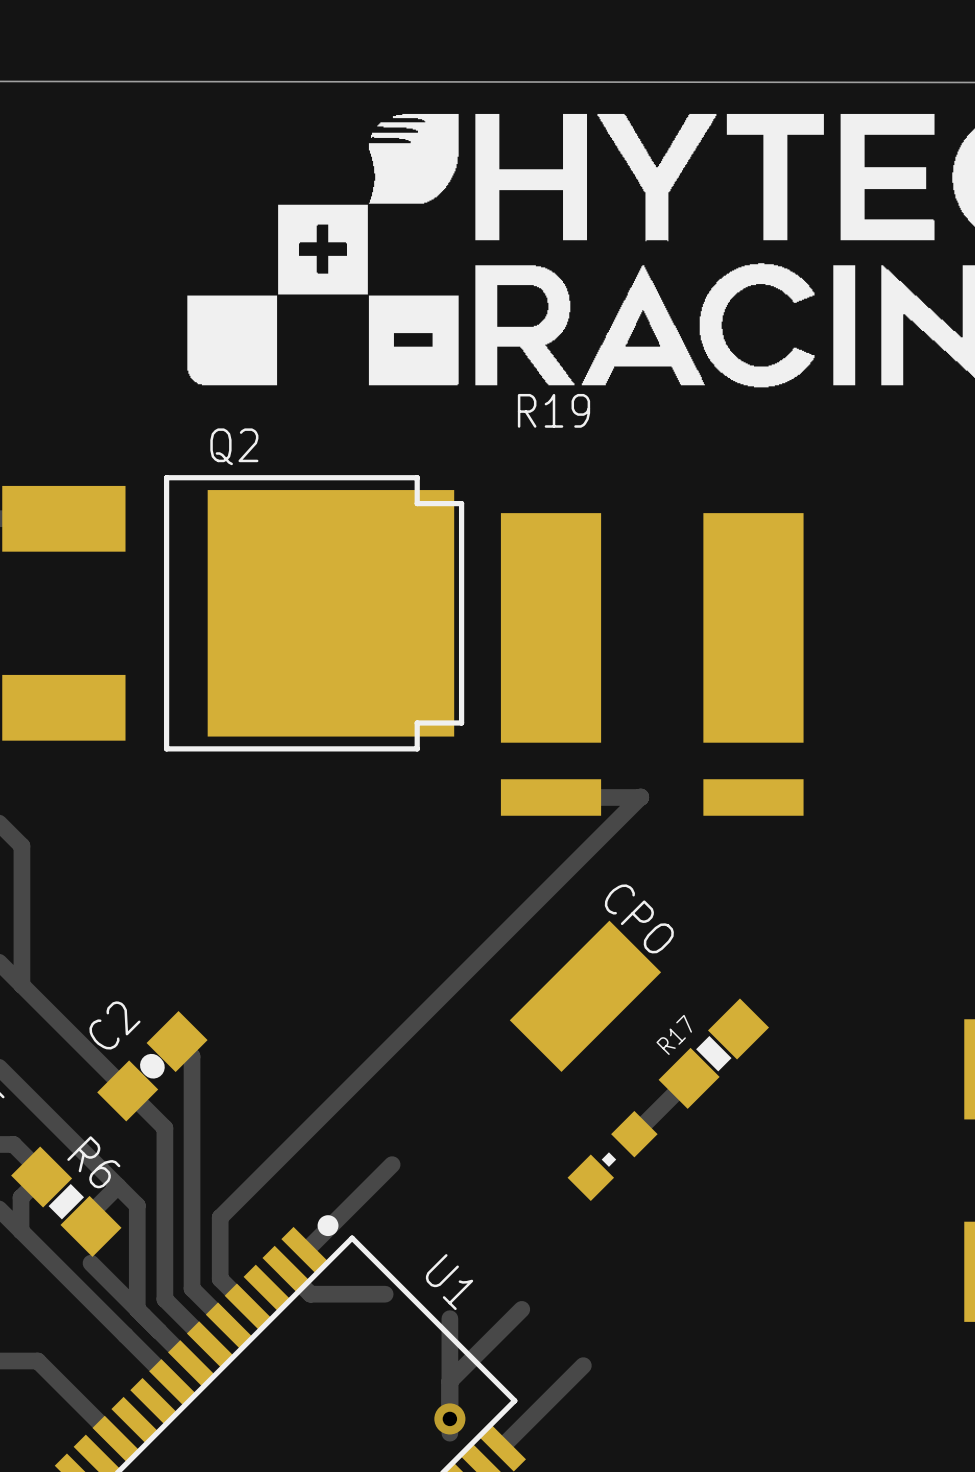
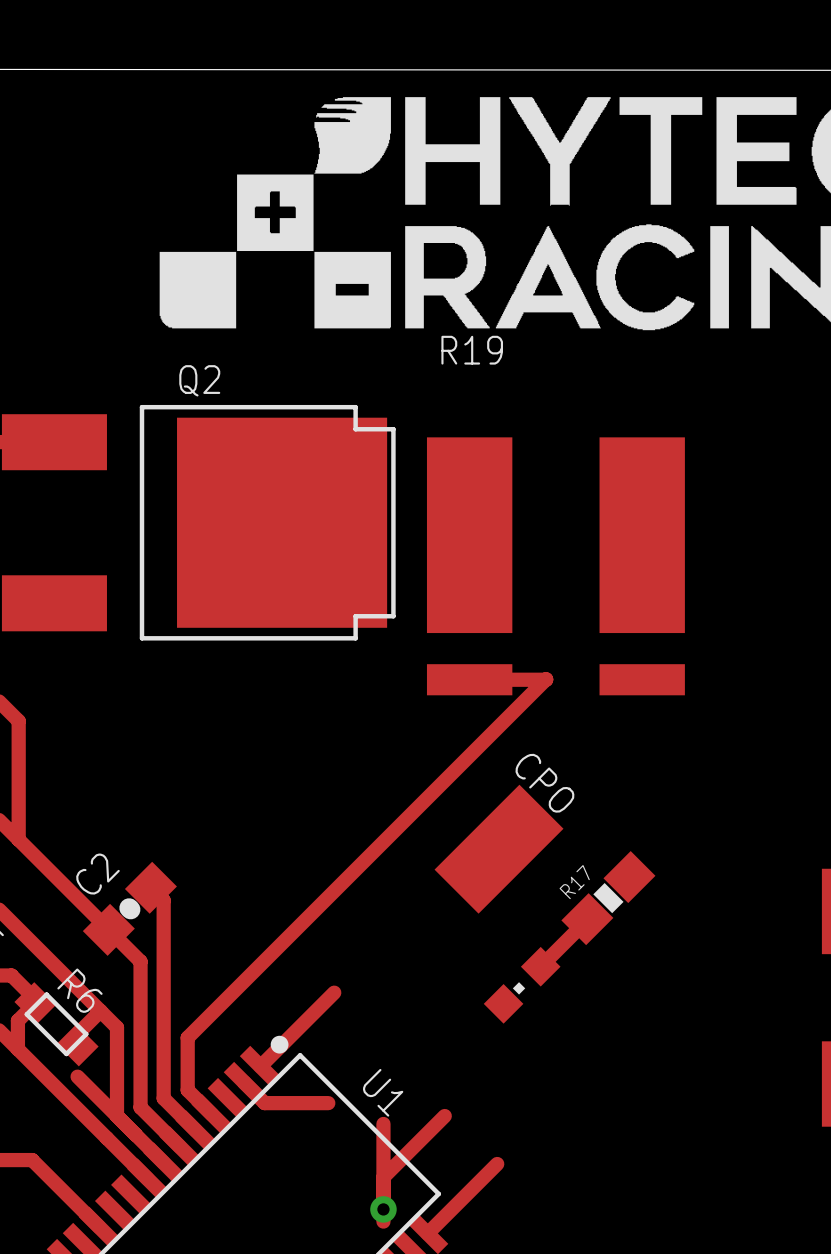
R6 footprint: [11, 1146, 122, 1257] -> [14, 982, 99, 1067]

